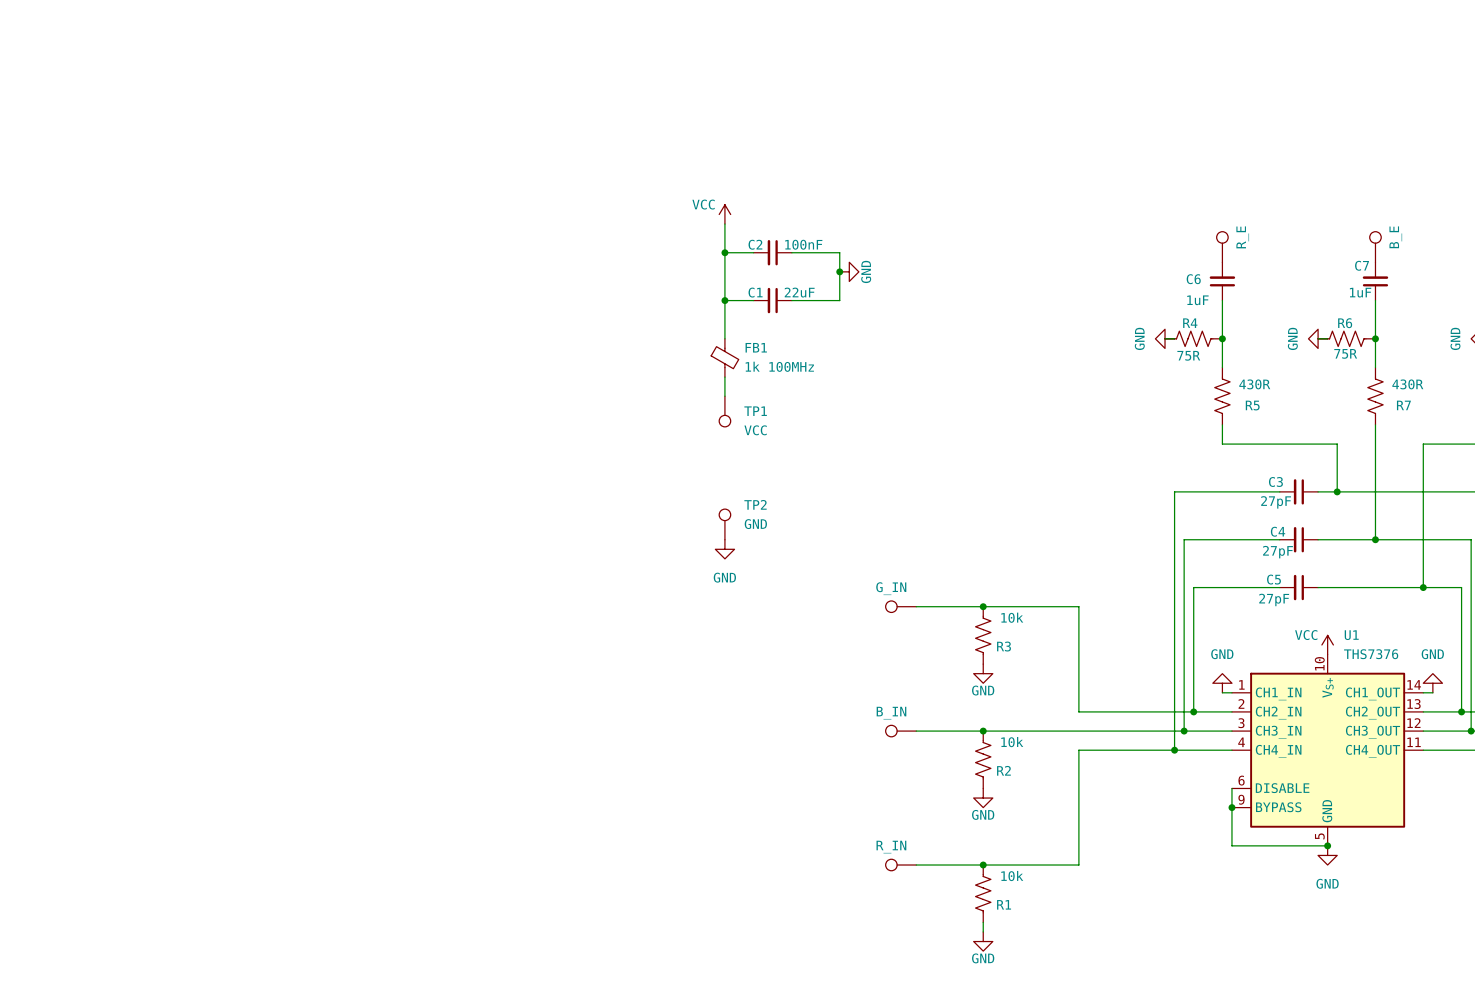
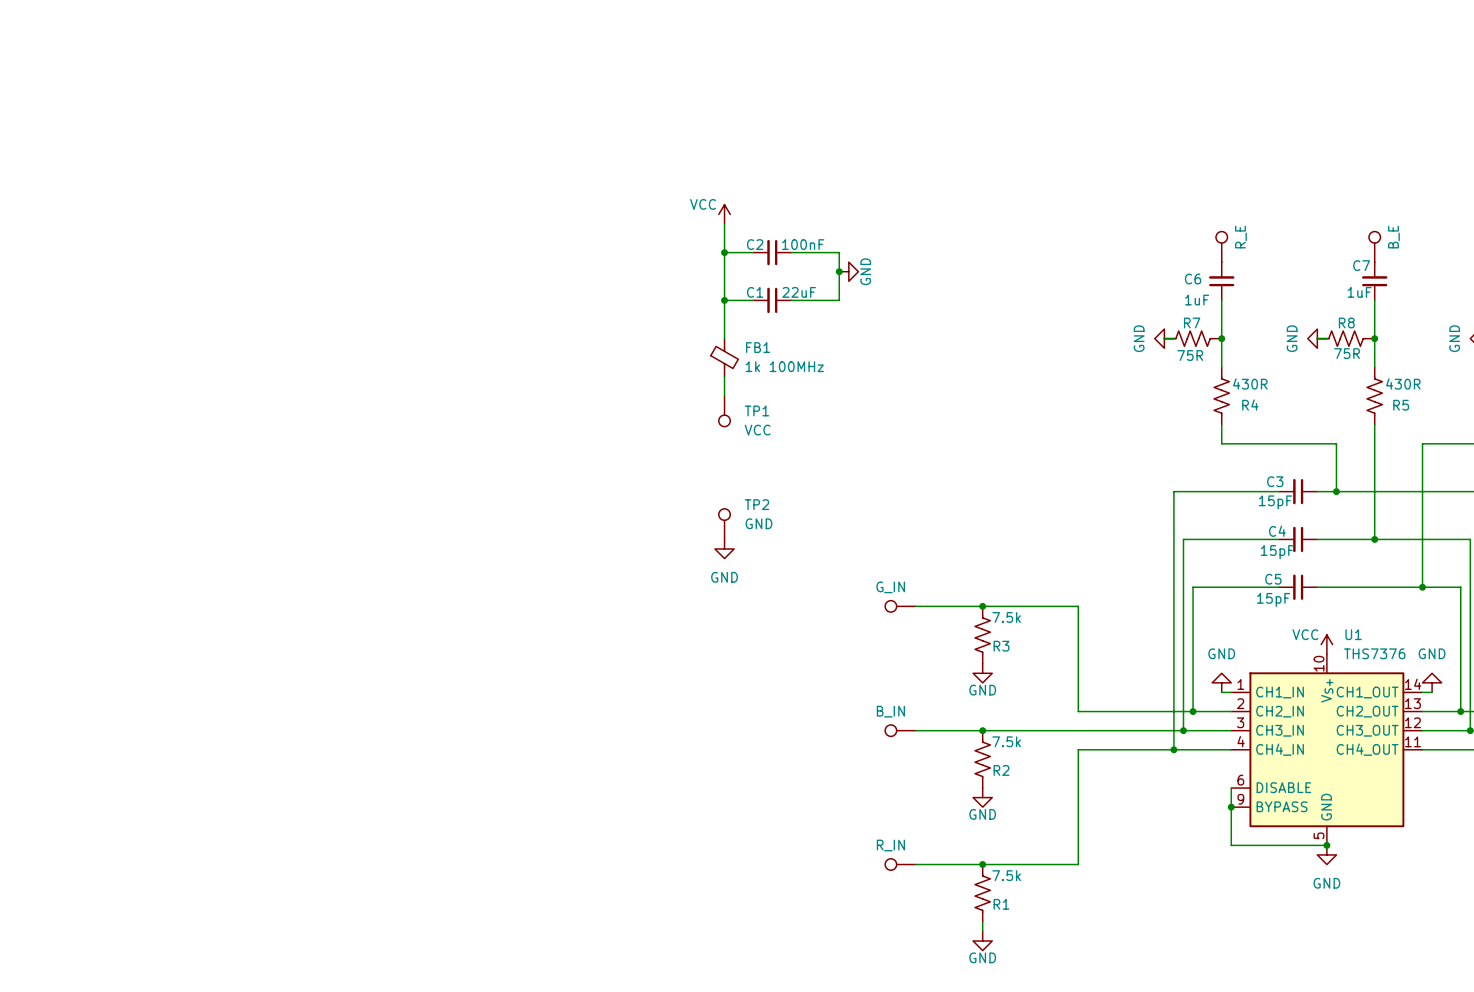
R4 name: R4 (1190, 323) -> R7 (1192, 322)
R6 name: R6 (1345, 323) -> R8 (1346, 322)
R5 name: R5 (1252, 405) -> R4 (1250, 404)
R7 name: R7 (1403, 405) -> R5 (1401, 405)
C3 value: 27pF (1276, 502) -> 15pF (1275, 502)
C4 value: 27pF (1277, 552) -> 15pF (1277, 552)
C5 value: 27pF (1274, 599) -> 15pF (1273, 599)
R3 value: 10k (1012, 617) -> 7.5k (1006, 617)
R2 value: 10k (1012, 742) -> 7.5k (1006, 741)
R1 value: 10k (1012, 876) -> 7.5k (1006, 875)

